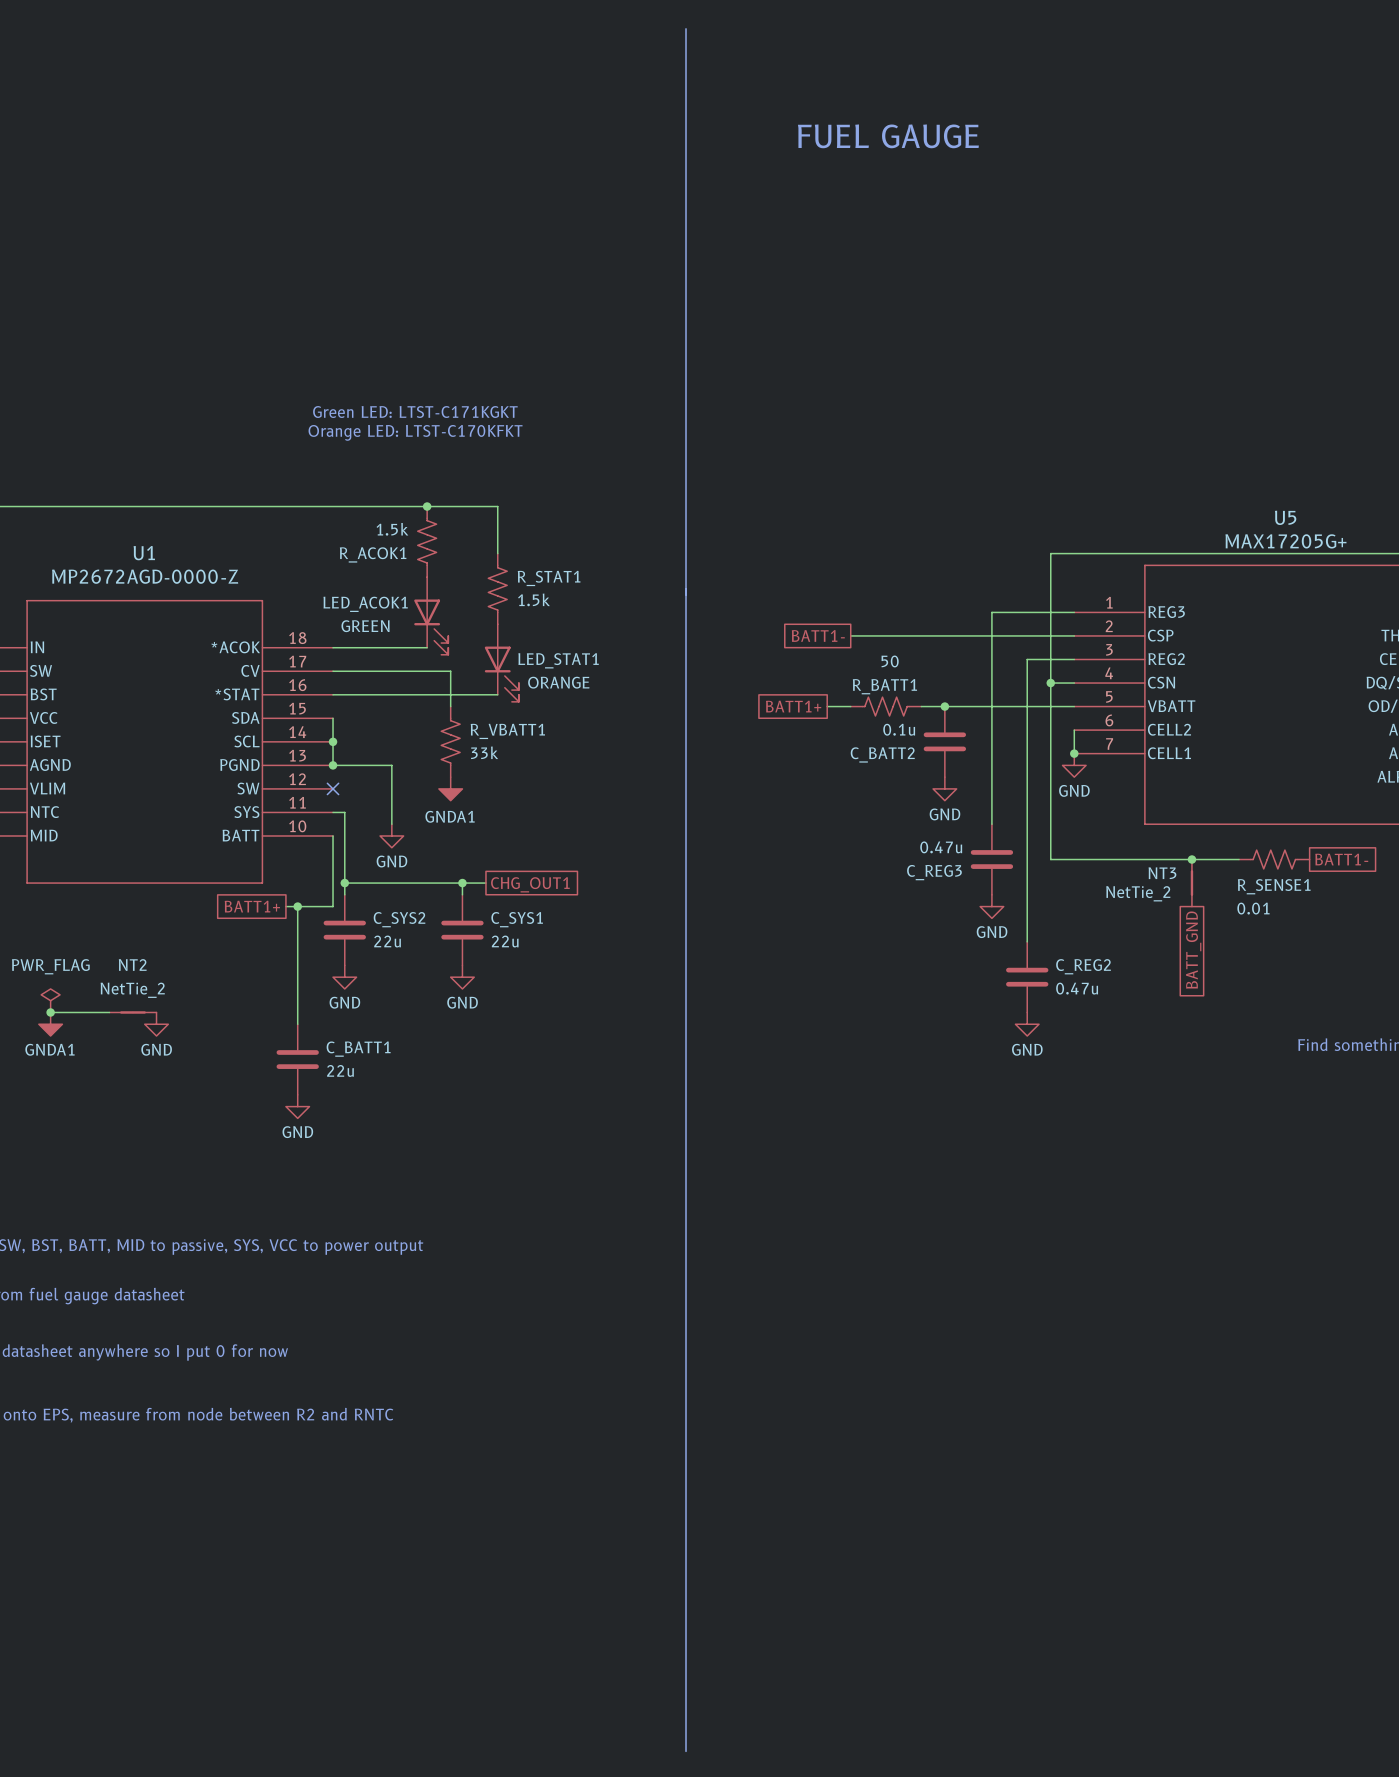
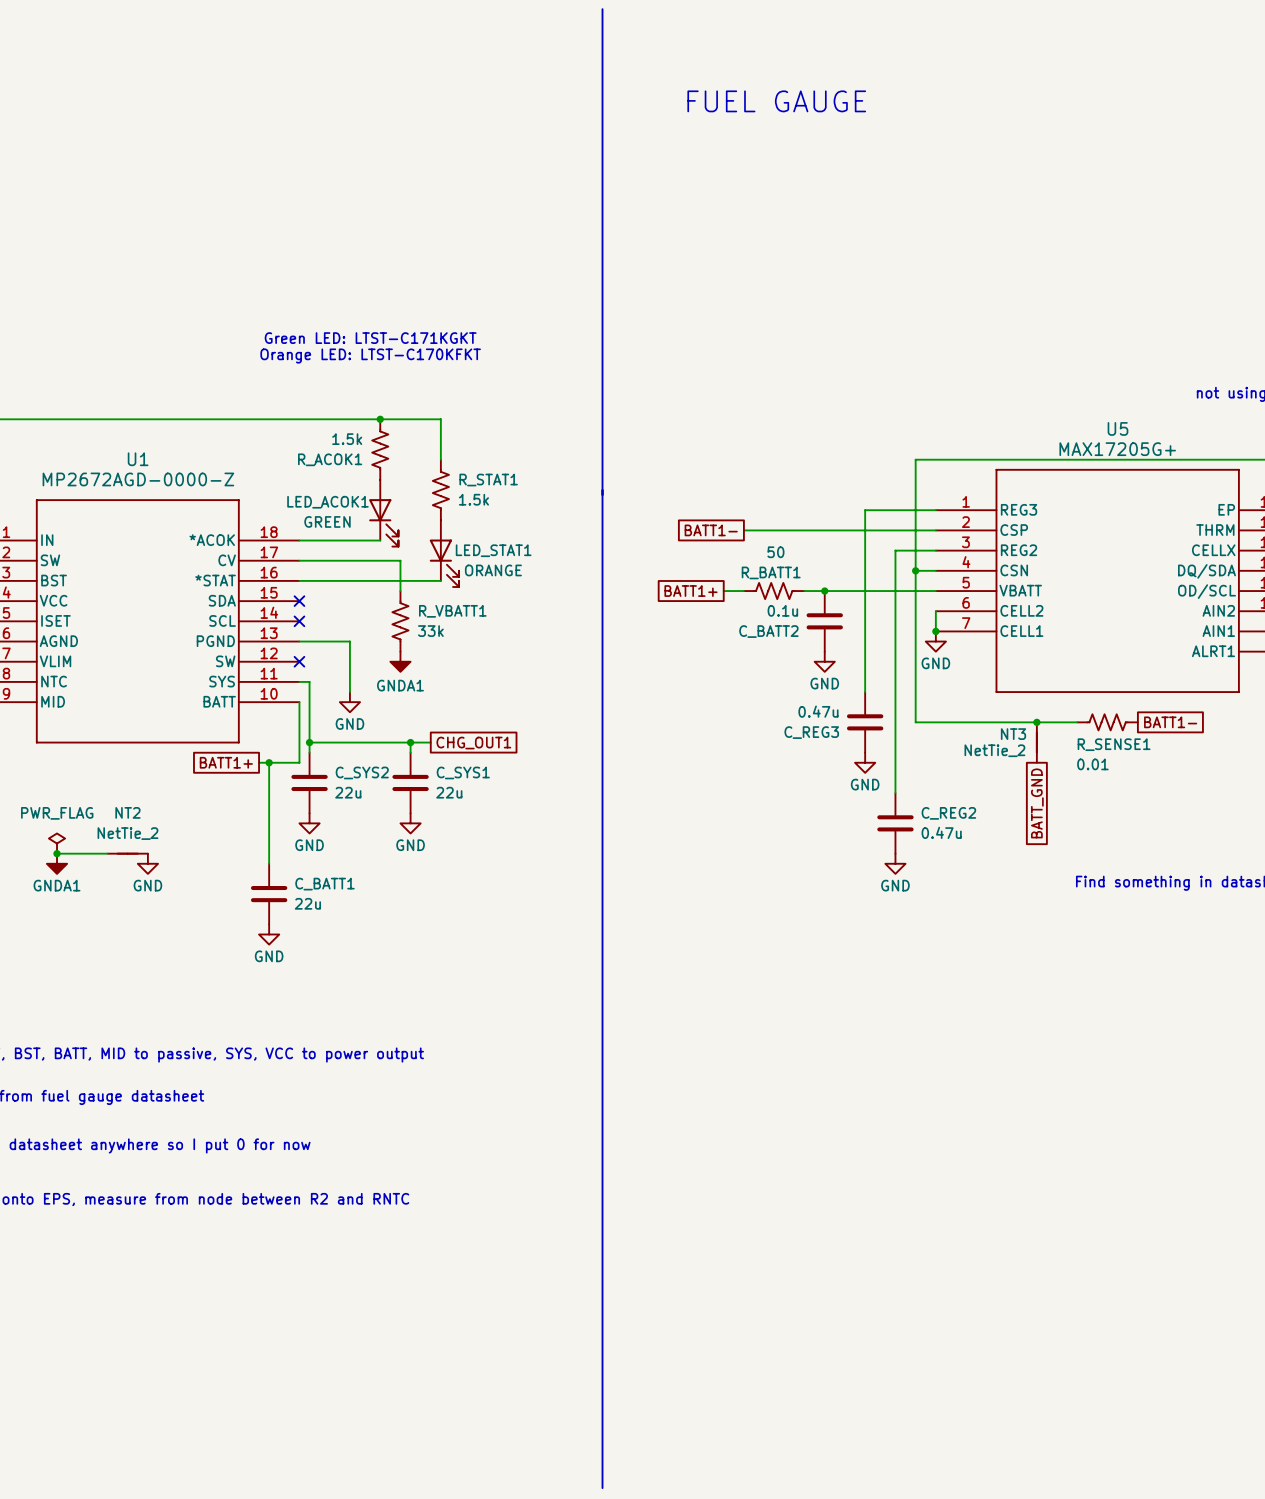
wire: (333, 718) (333, 765) -> none
no-connect mark: none -> (299, 601)
junction: (333, 741) -> none
no-connect mark: none -> (299, 621)
junction: (333, 765) -> none

